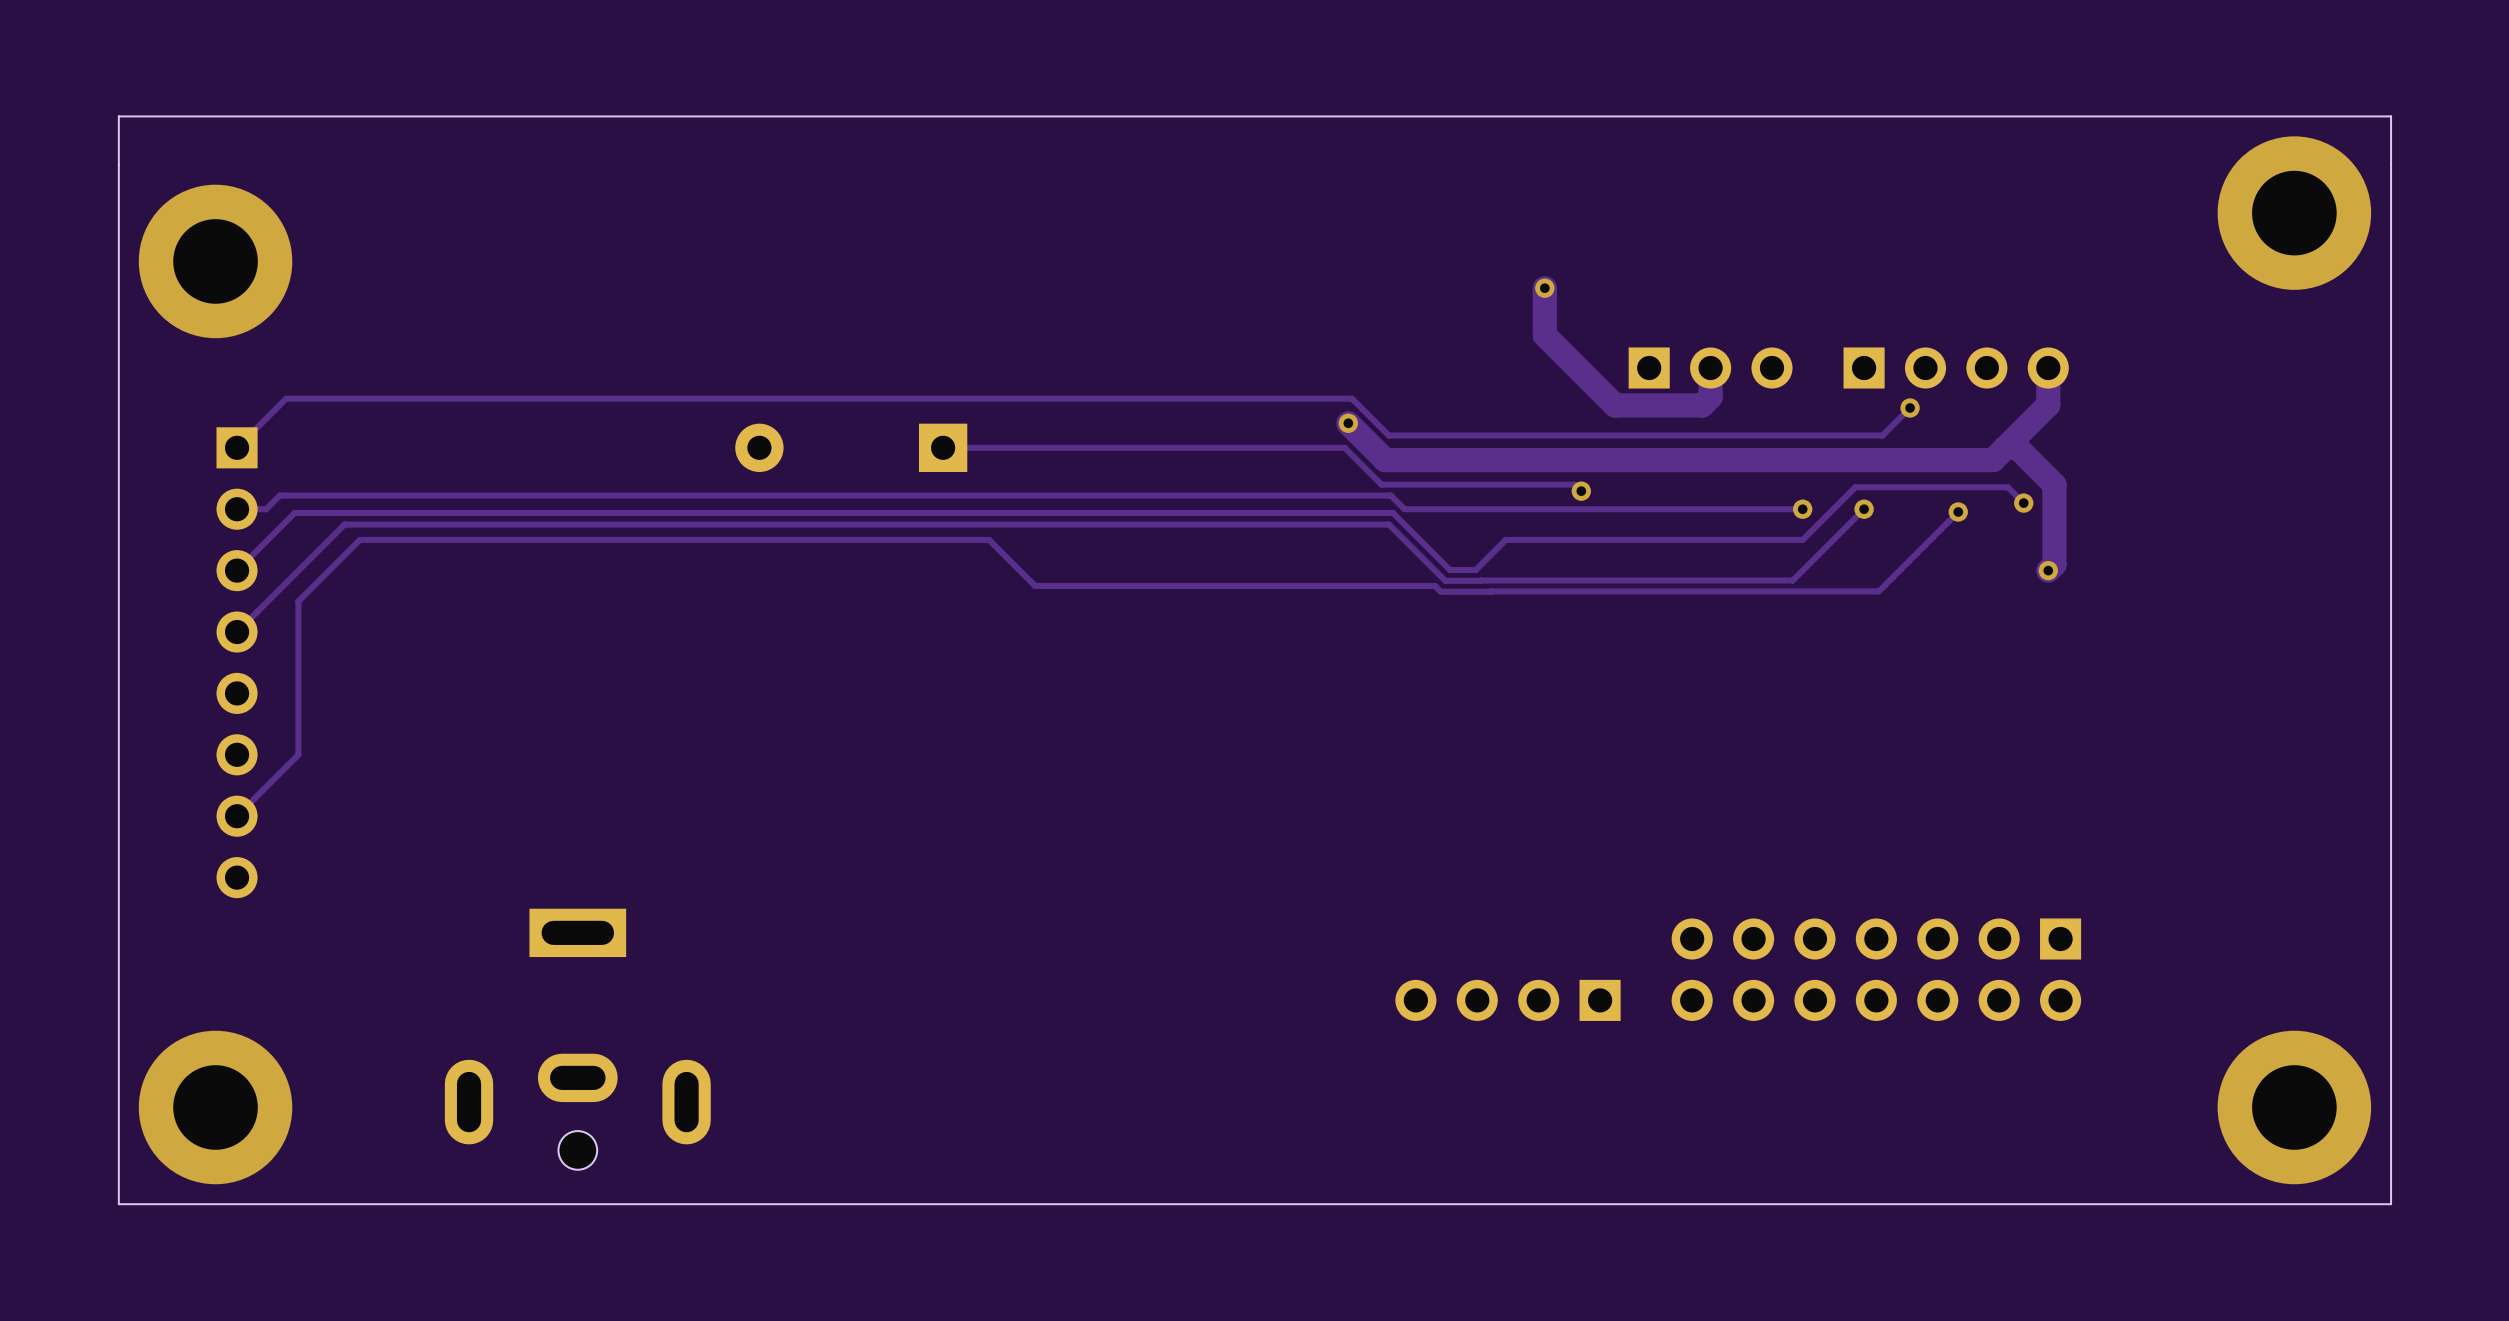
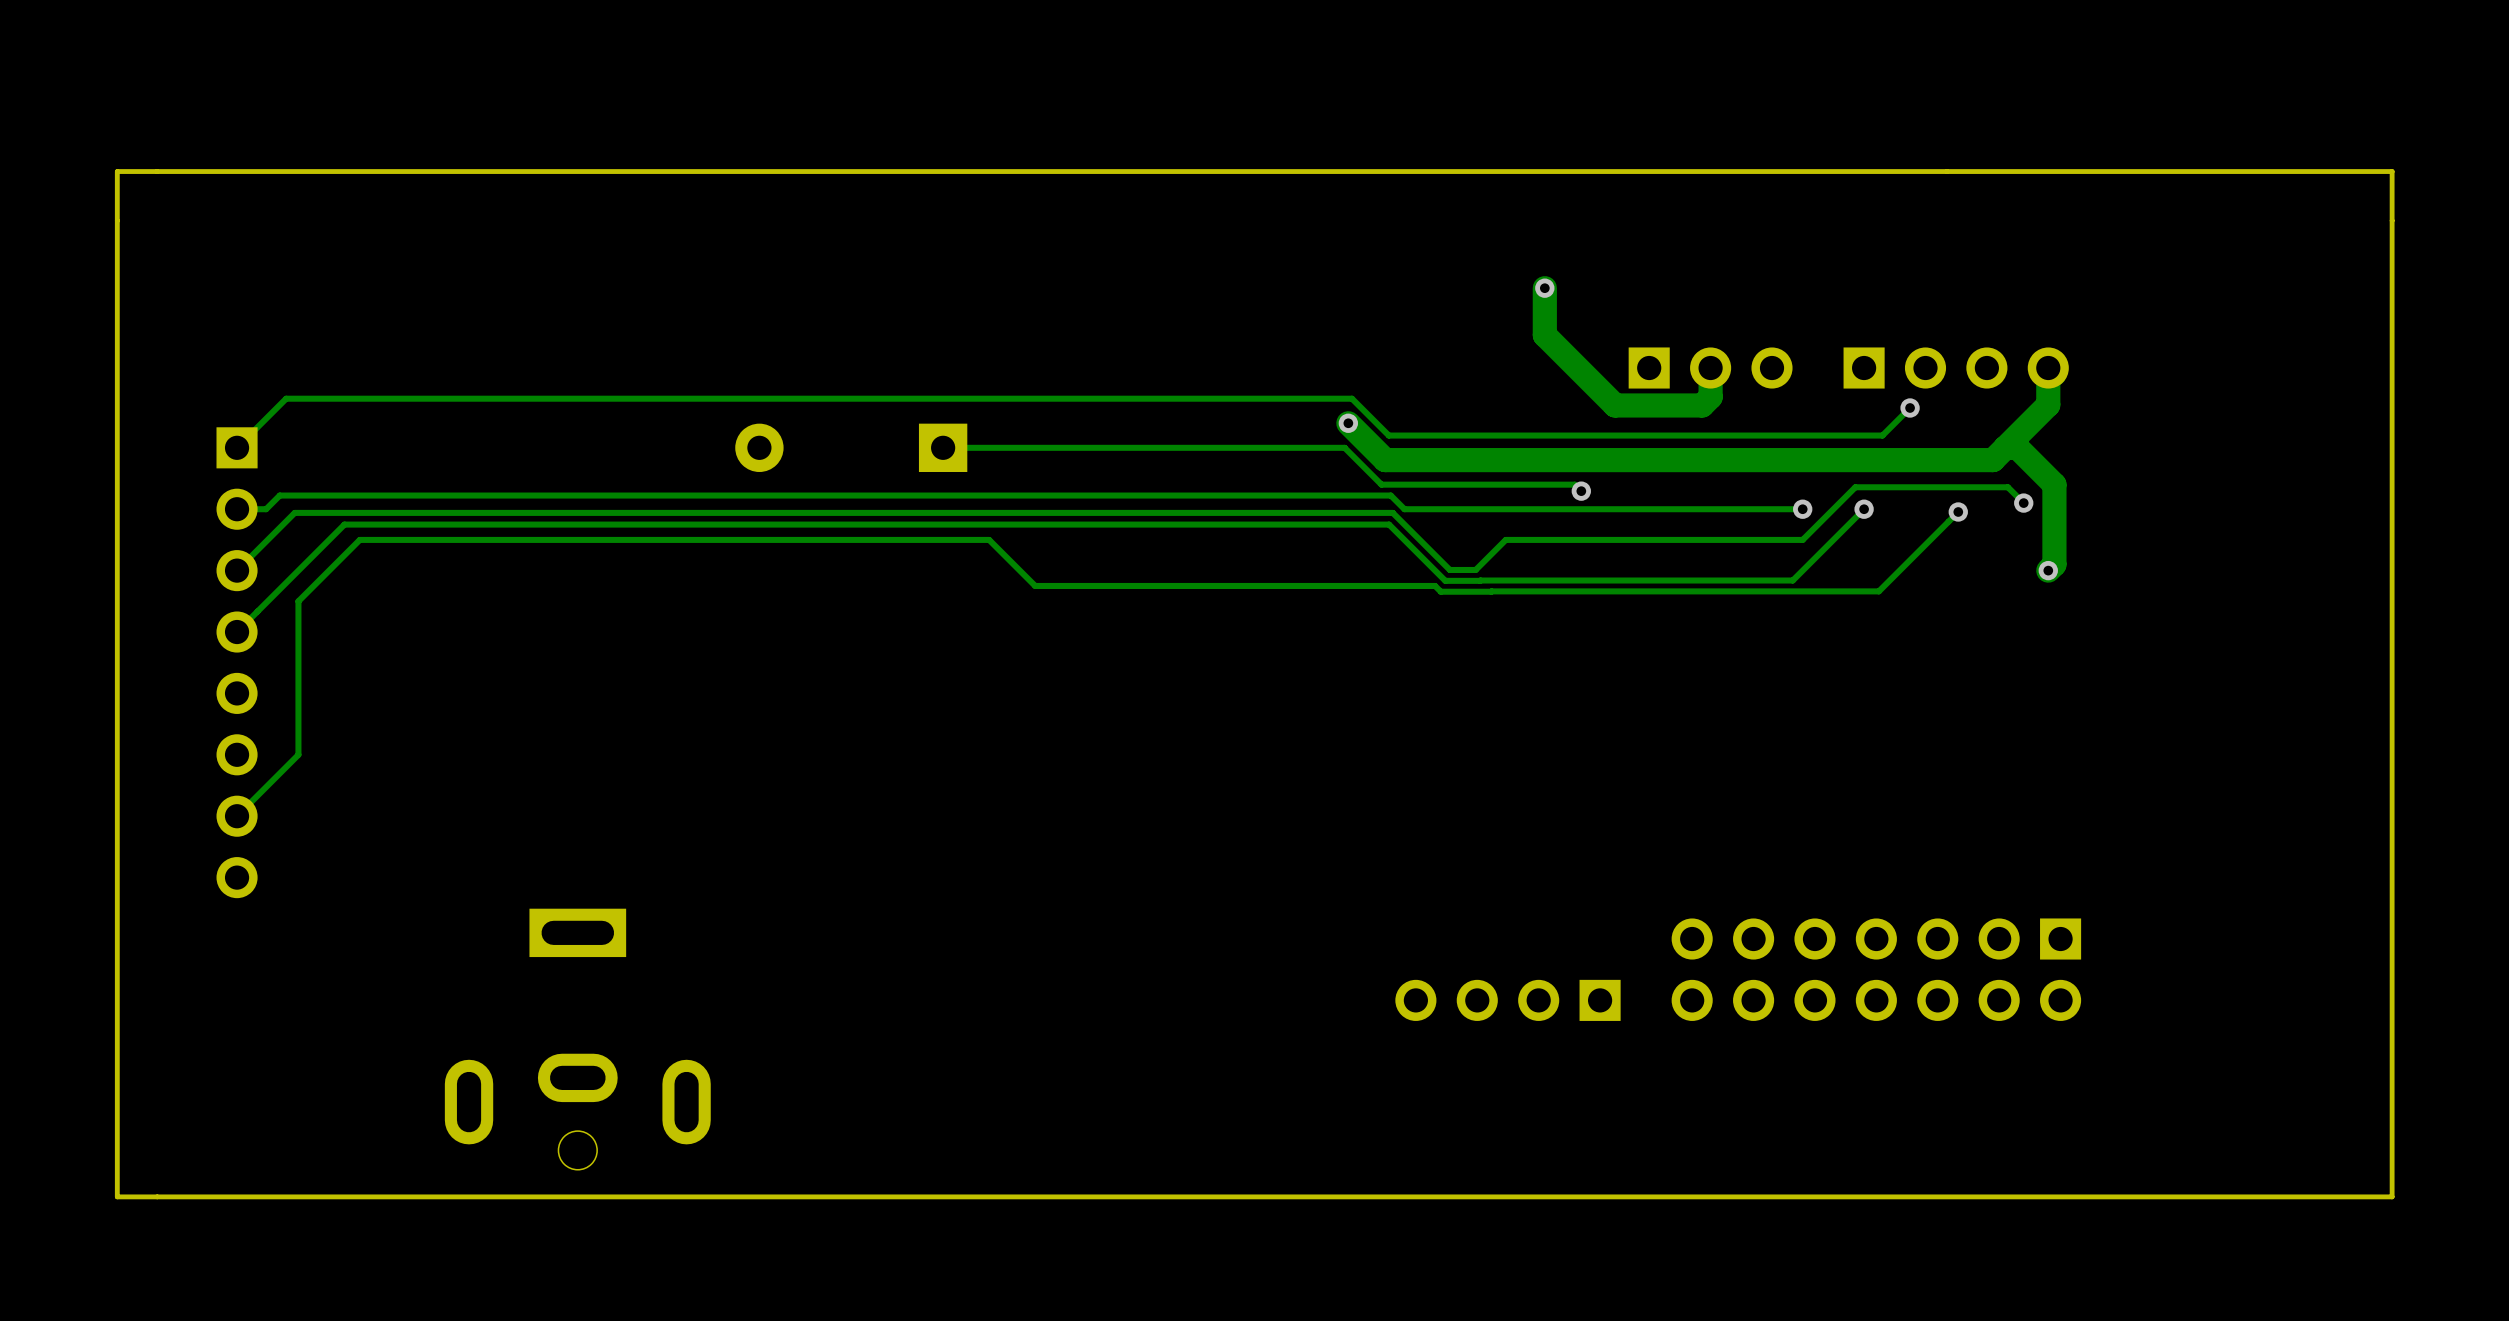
board edge: (2391, 116) (2391, 1204) (118, 1204) (118, 116) (2391, 116) -> (2392, 171) (2392, 1196) (117, 1196) (117, 171) (2392, 171)
via: (2294, 213) -> none
via: (215, 261) -> none
via: (215, 1107) -> none
via: (2294, 1107) -> none

